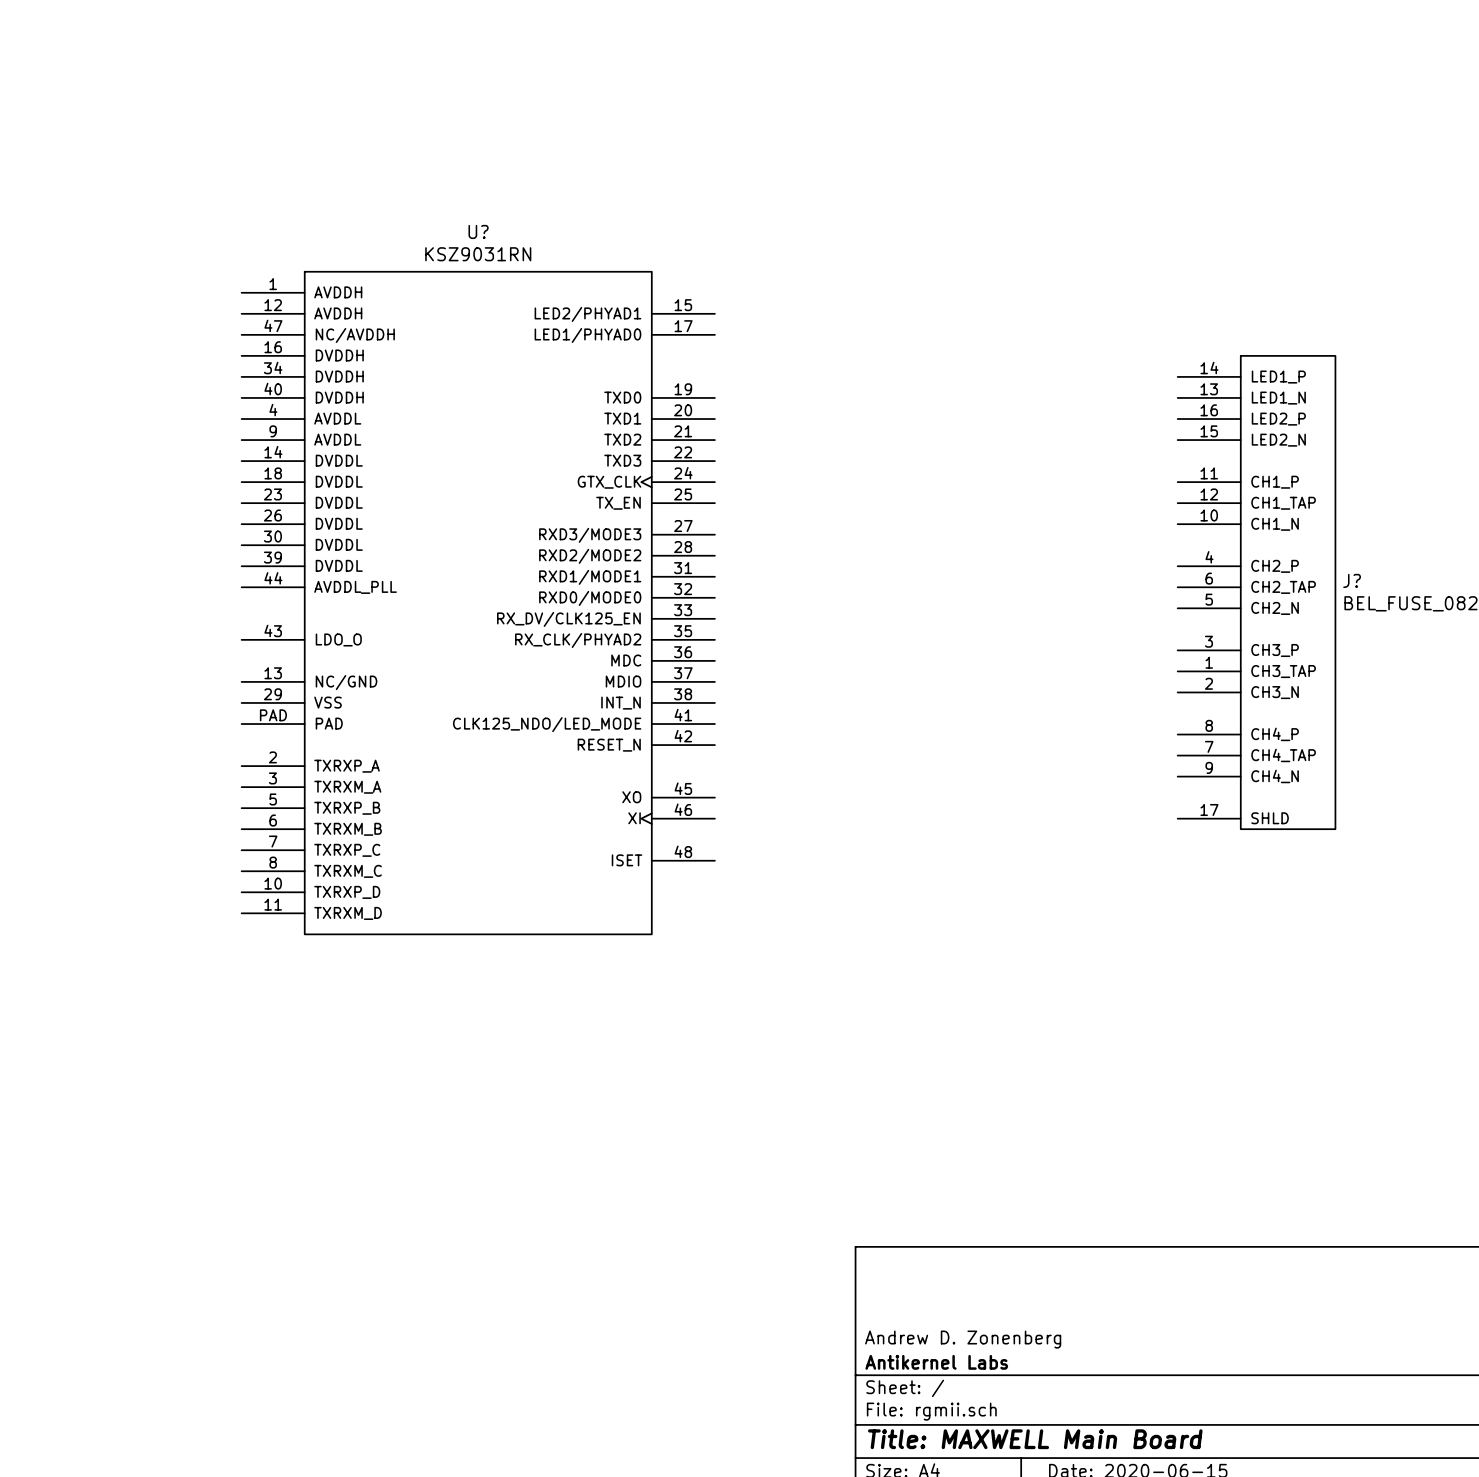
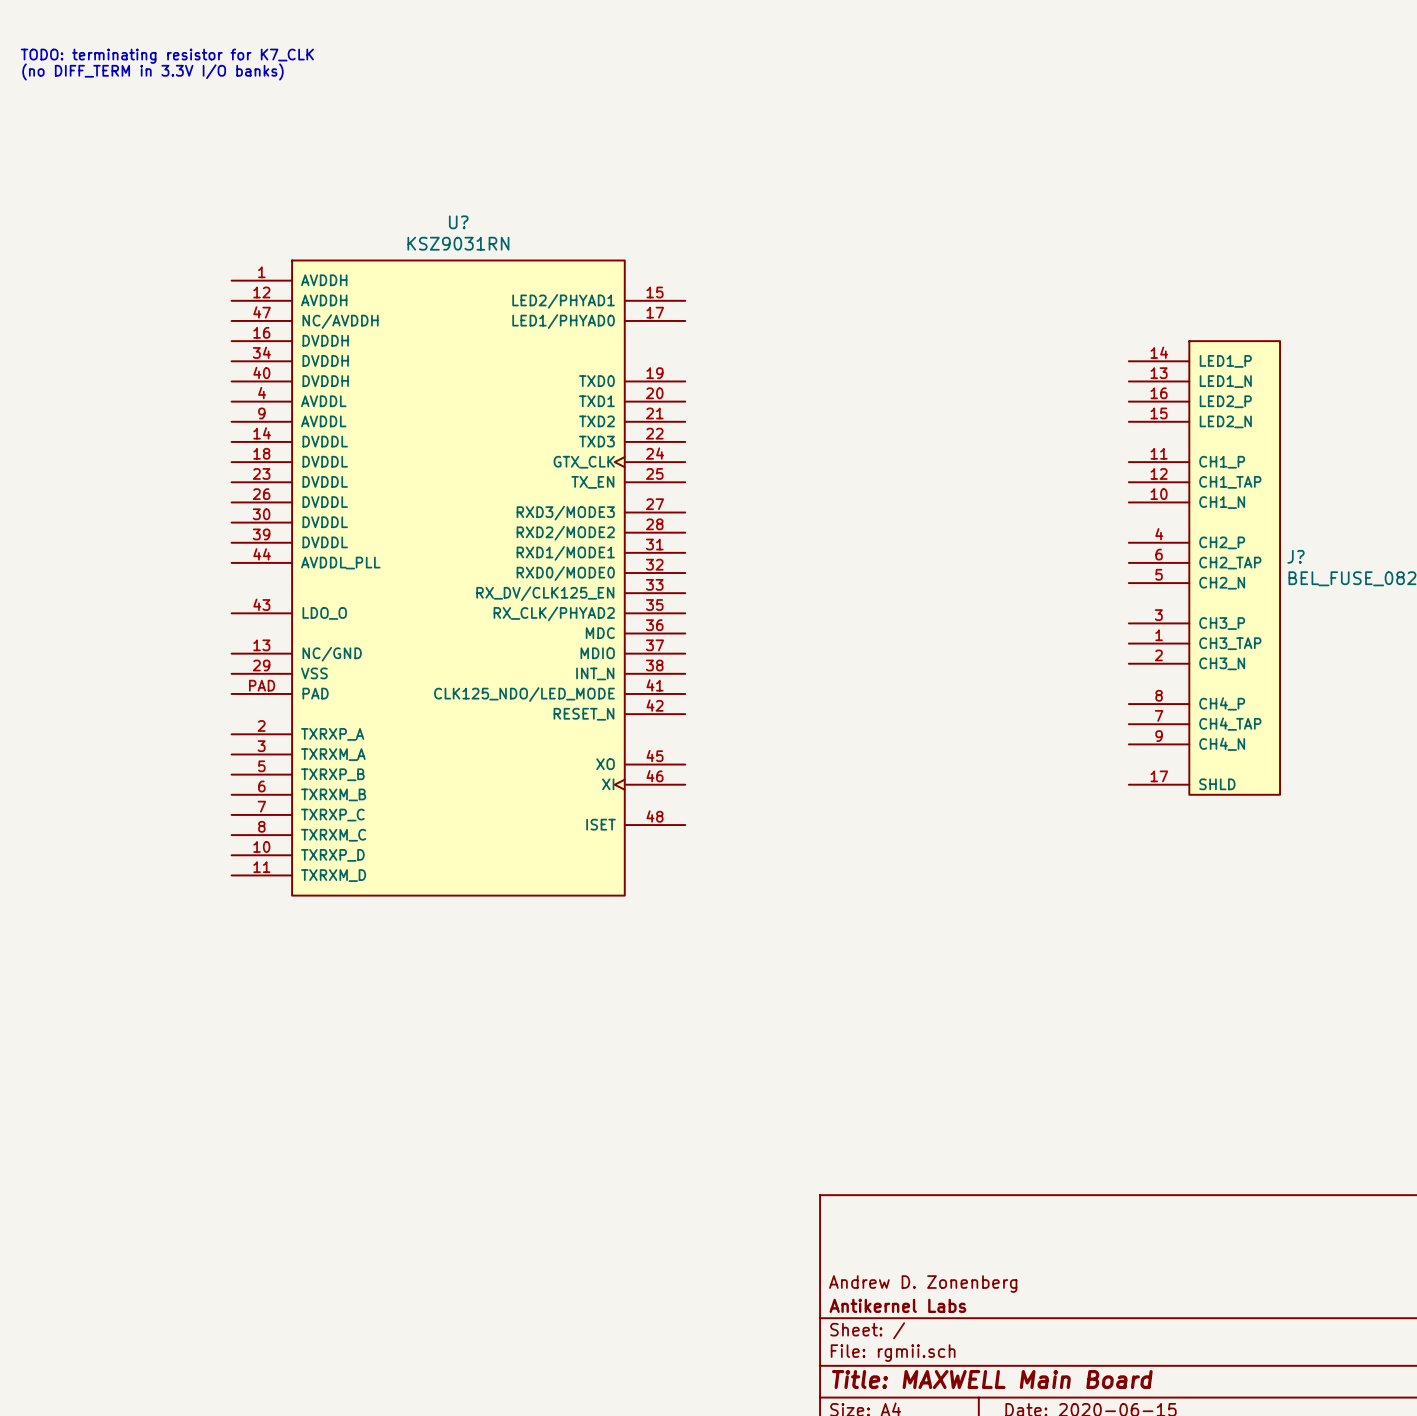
text: none -> TODO: terminating resistor for K7_CLK (167, 56)
text: none -> (no DIFF_TERM in 3.3V I/O banks) (152, 71)

